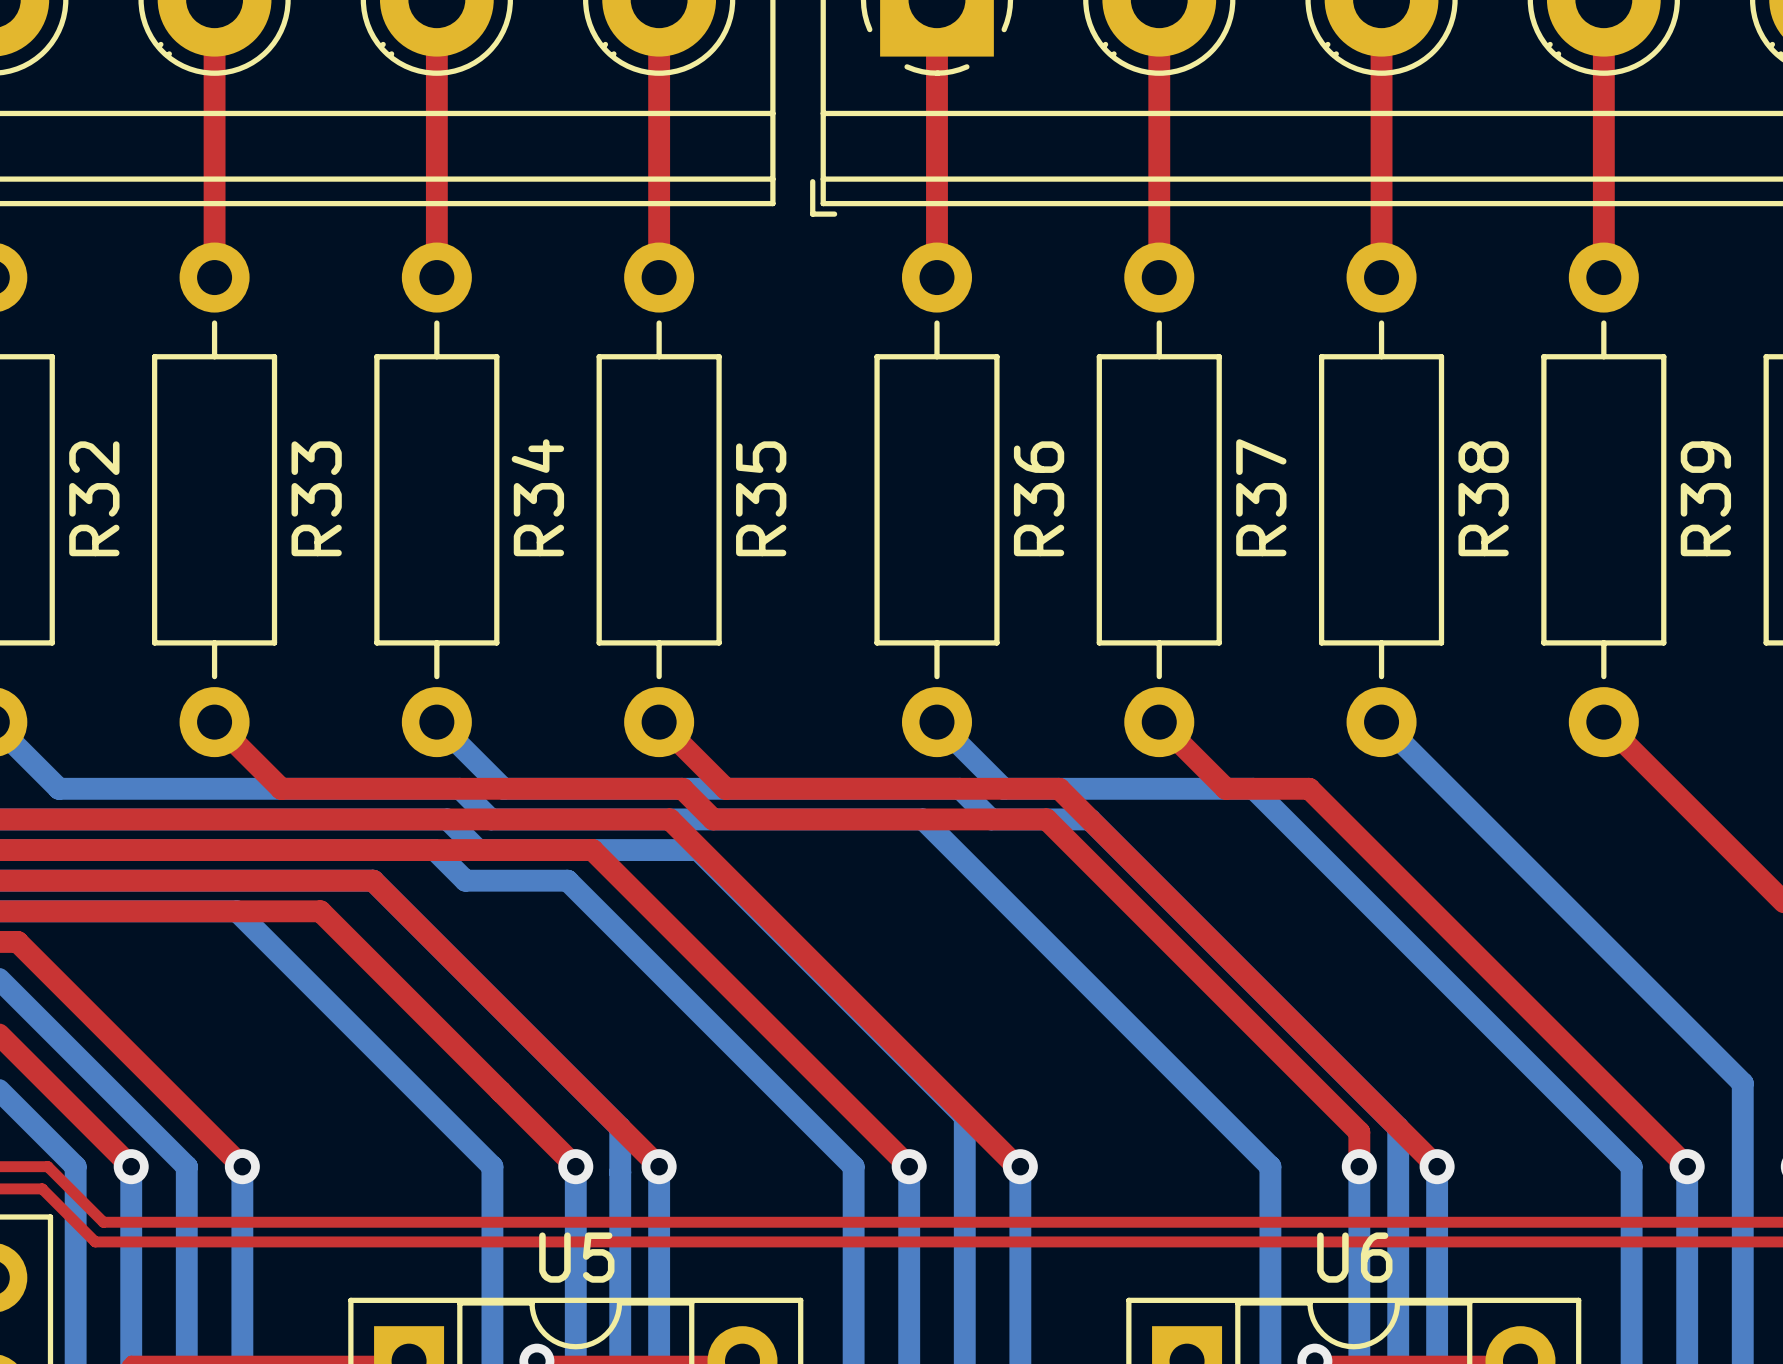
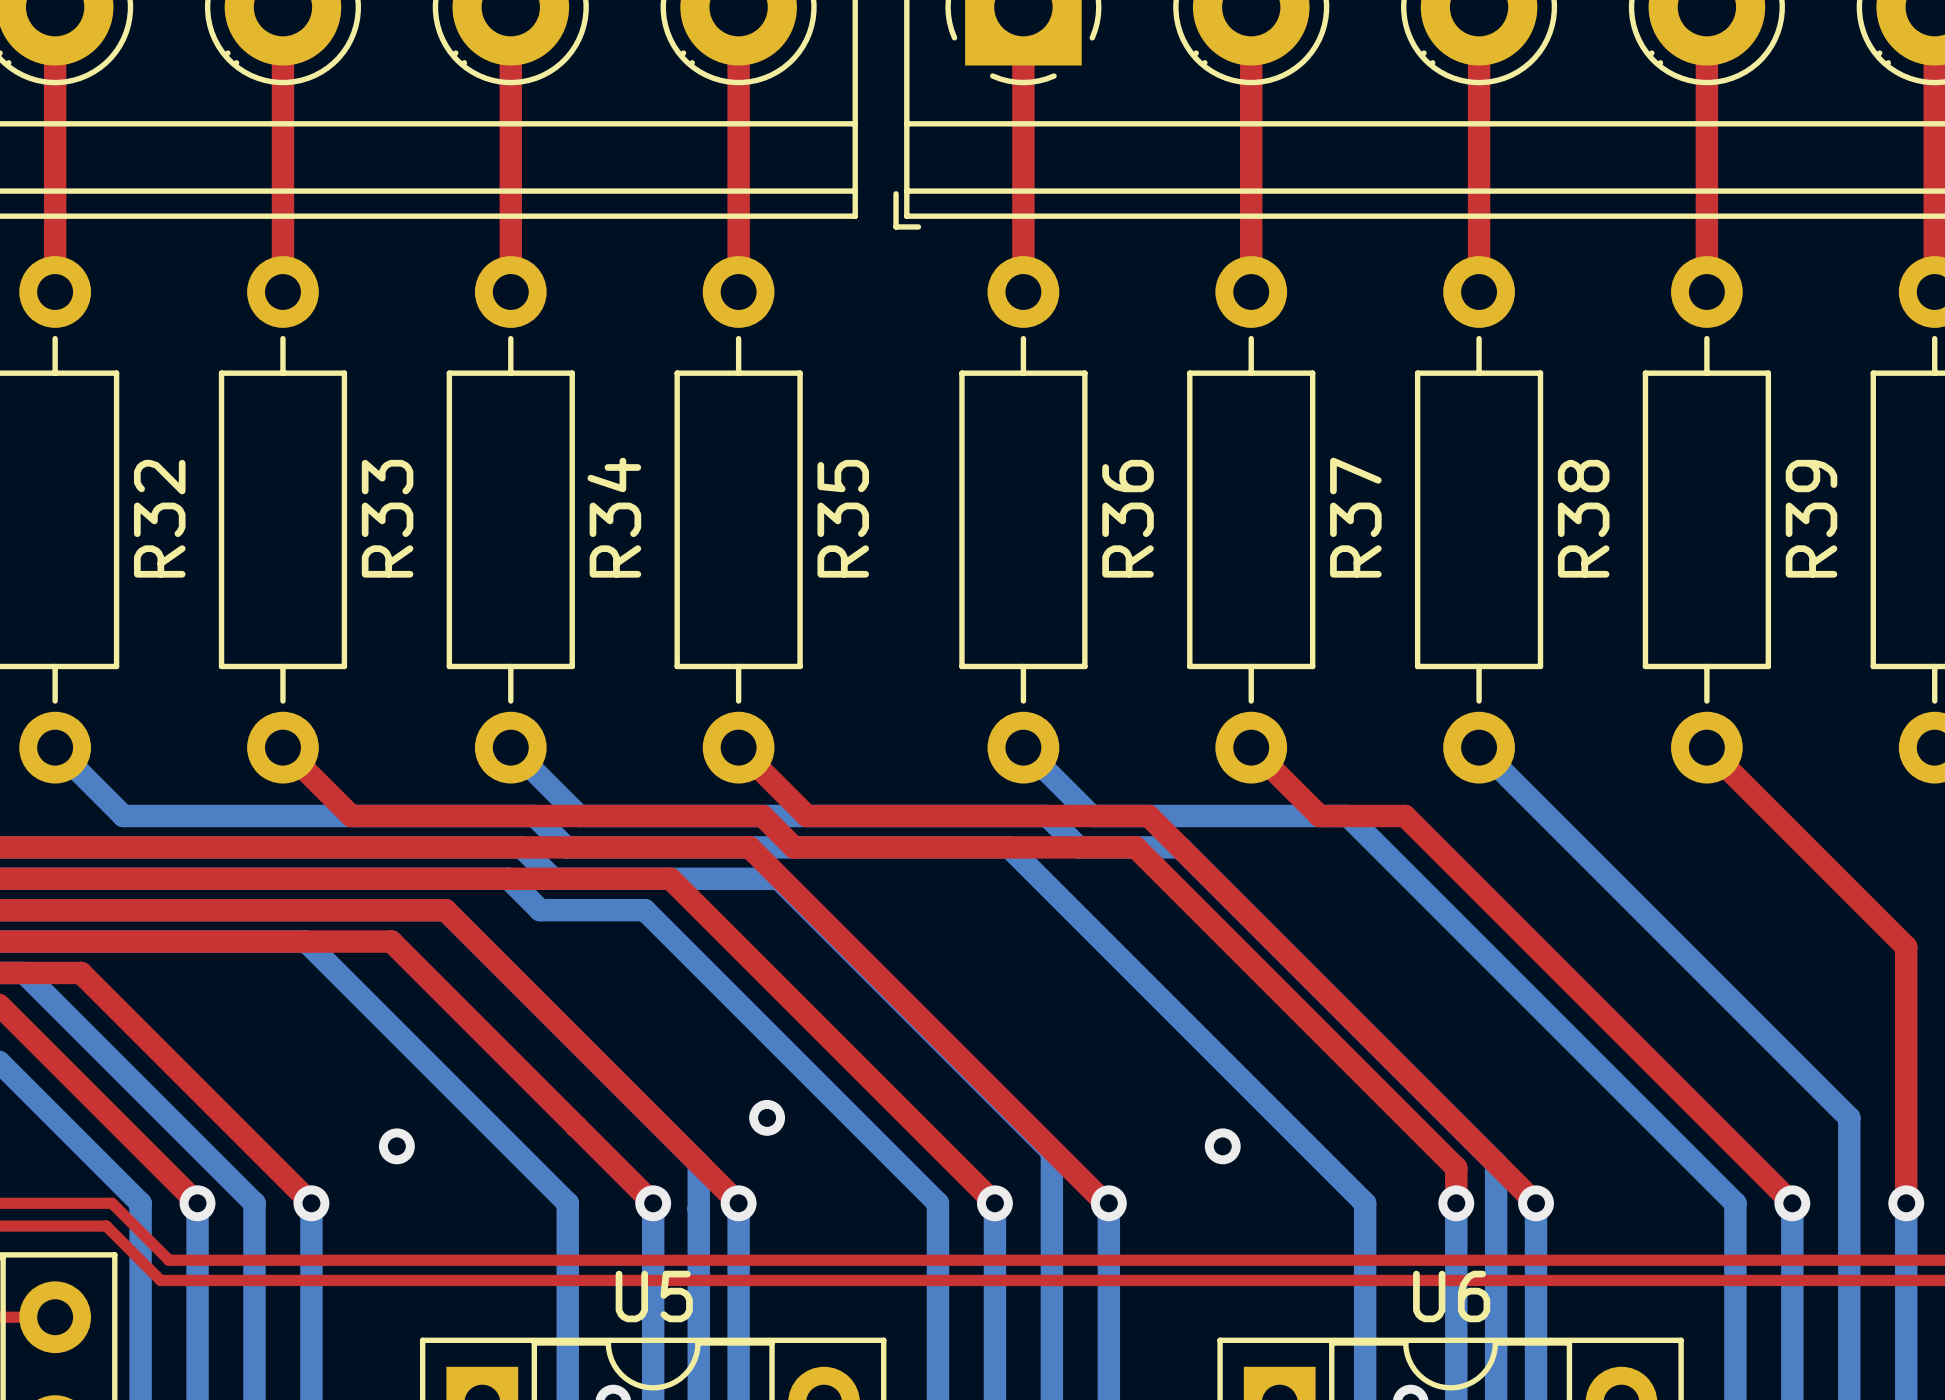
via: none -> (767, 1117)
via: none -> (396, 1146)
via: none -> (1222, 1146)

